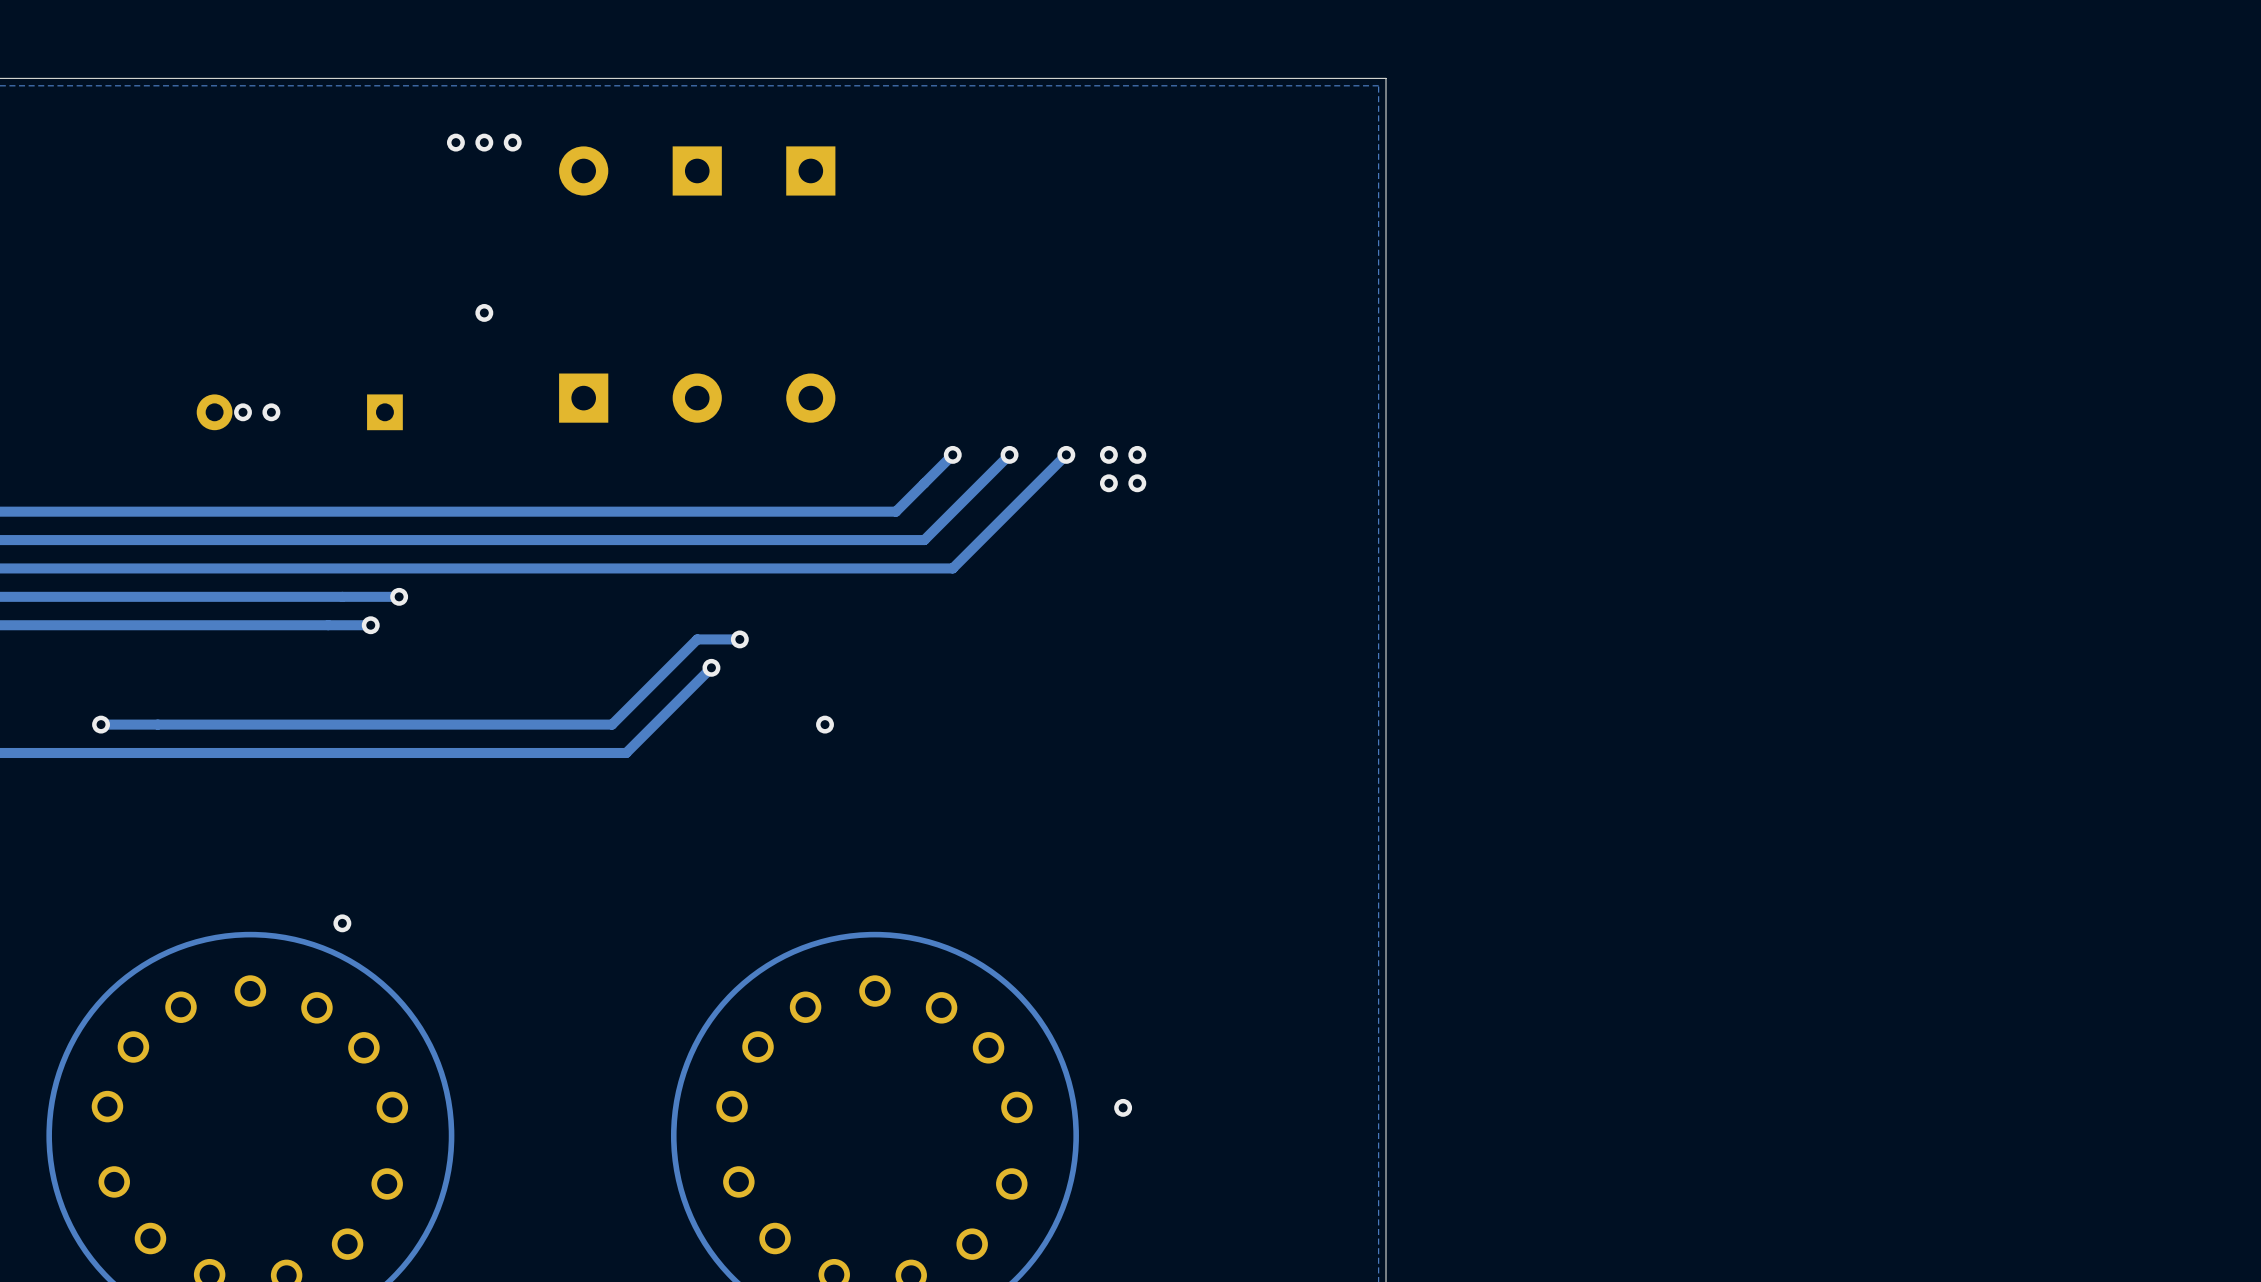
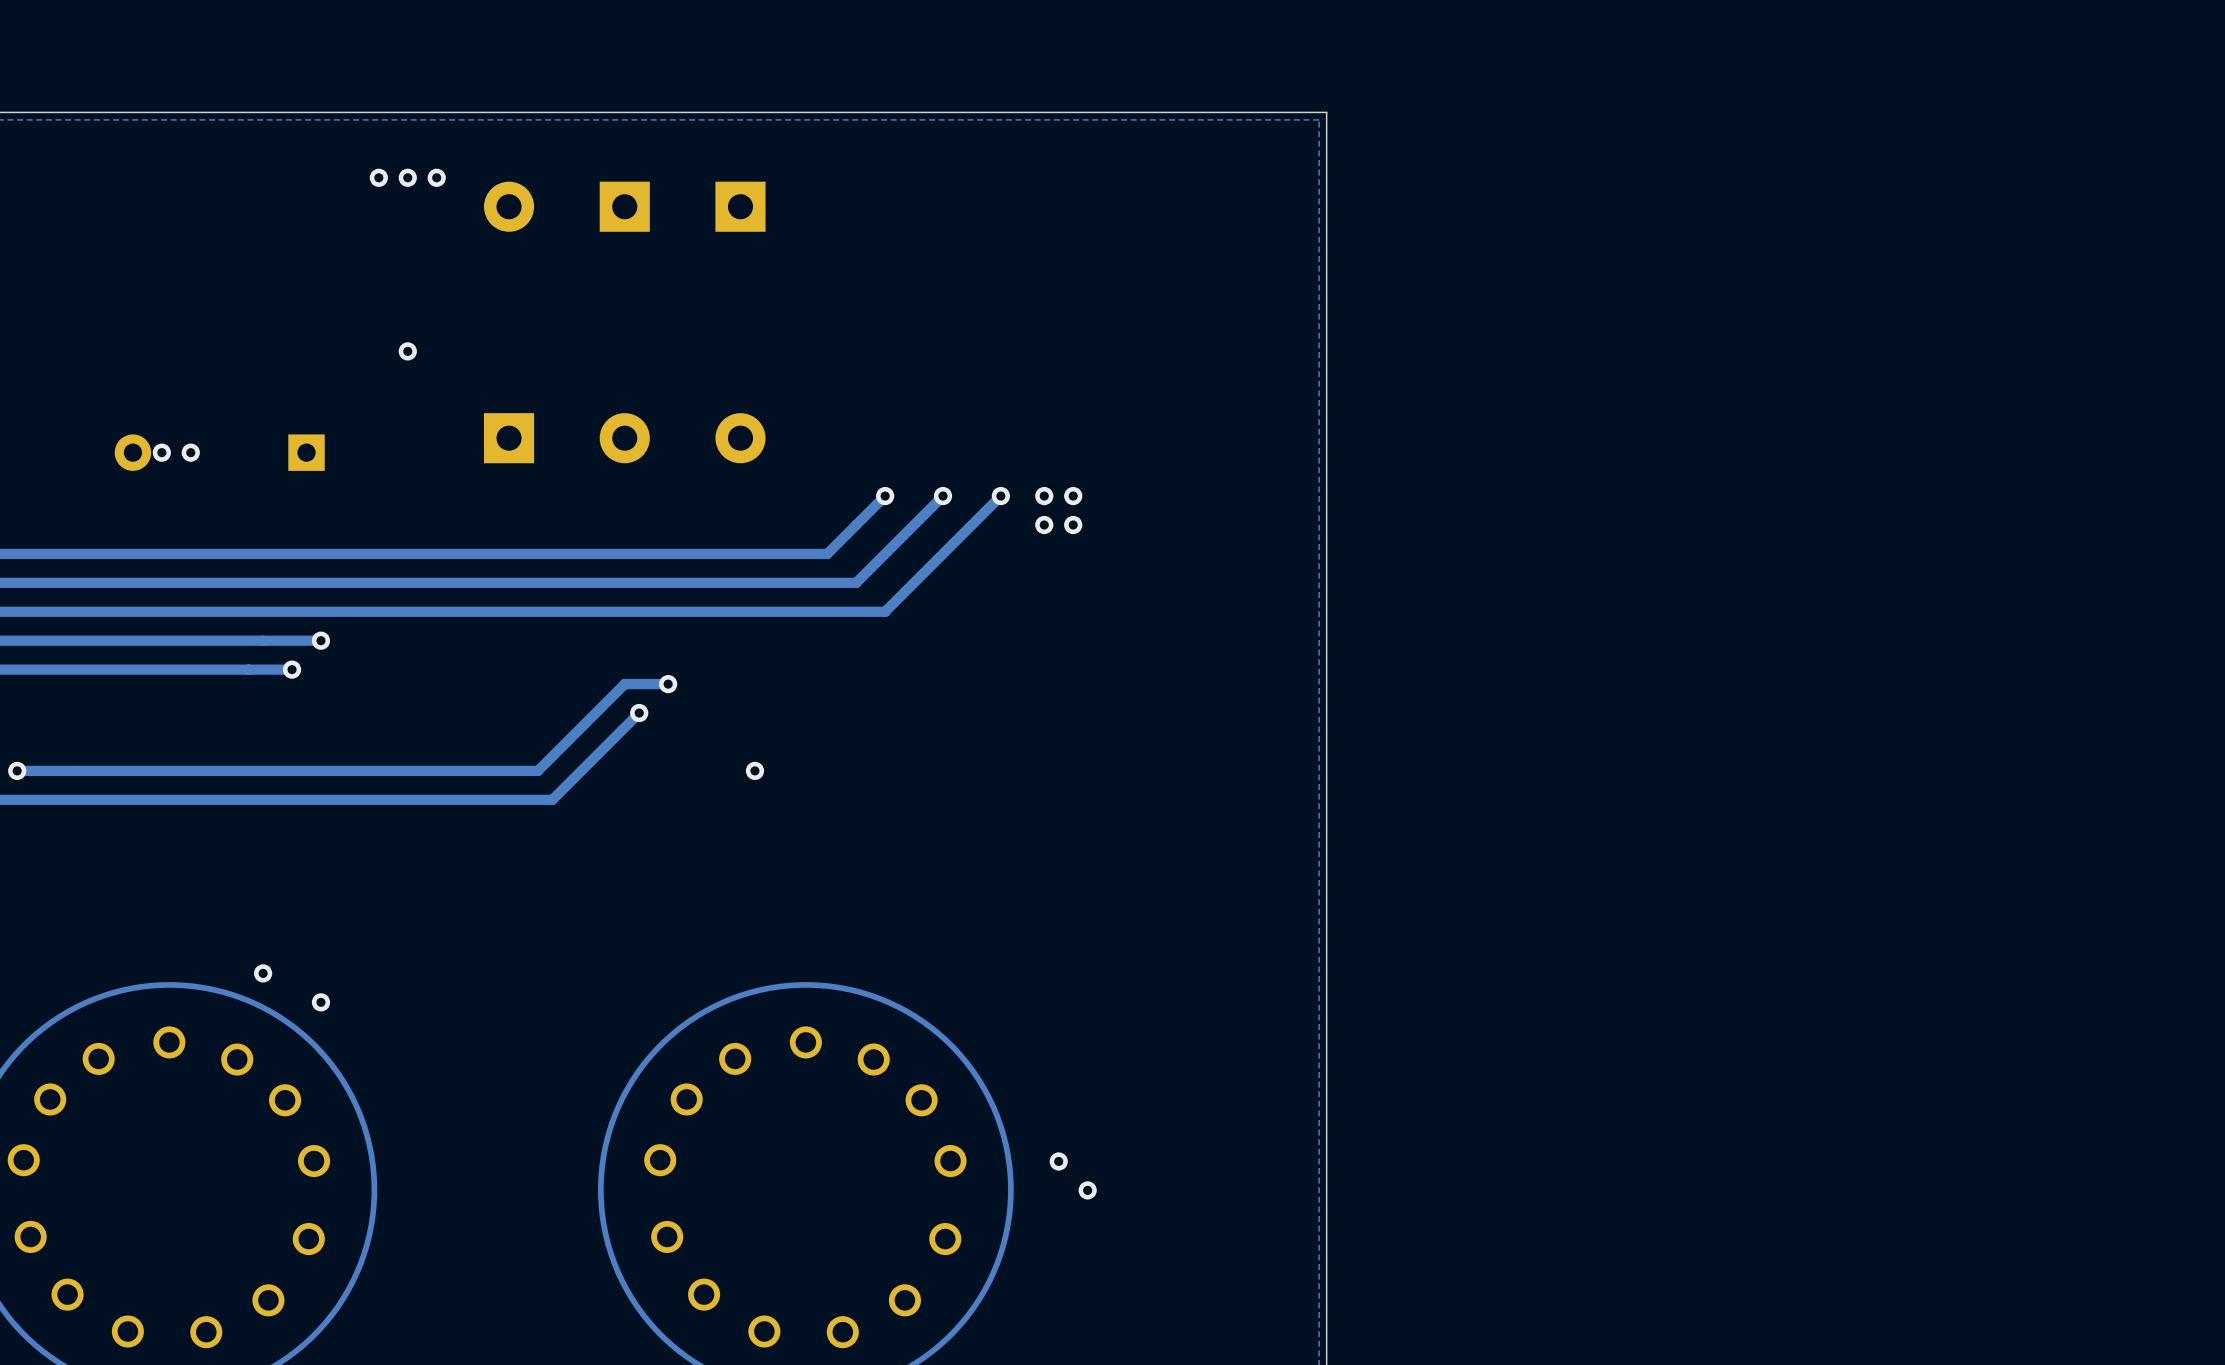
via: none -> (320, 1002)
via: none -> (1087, 1190)

